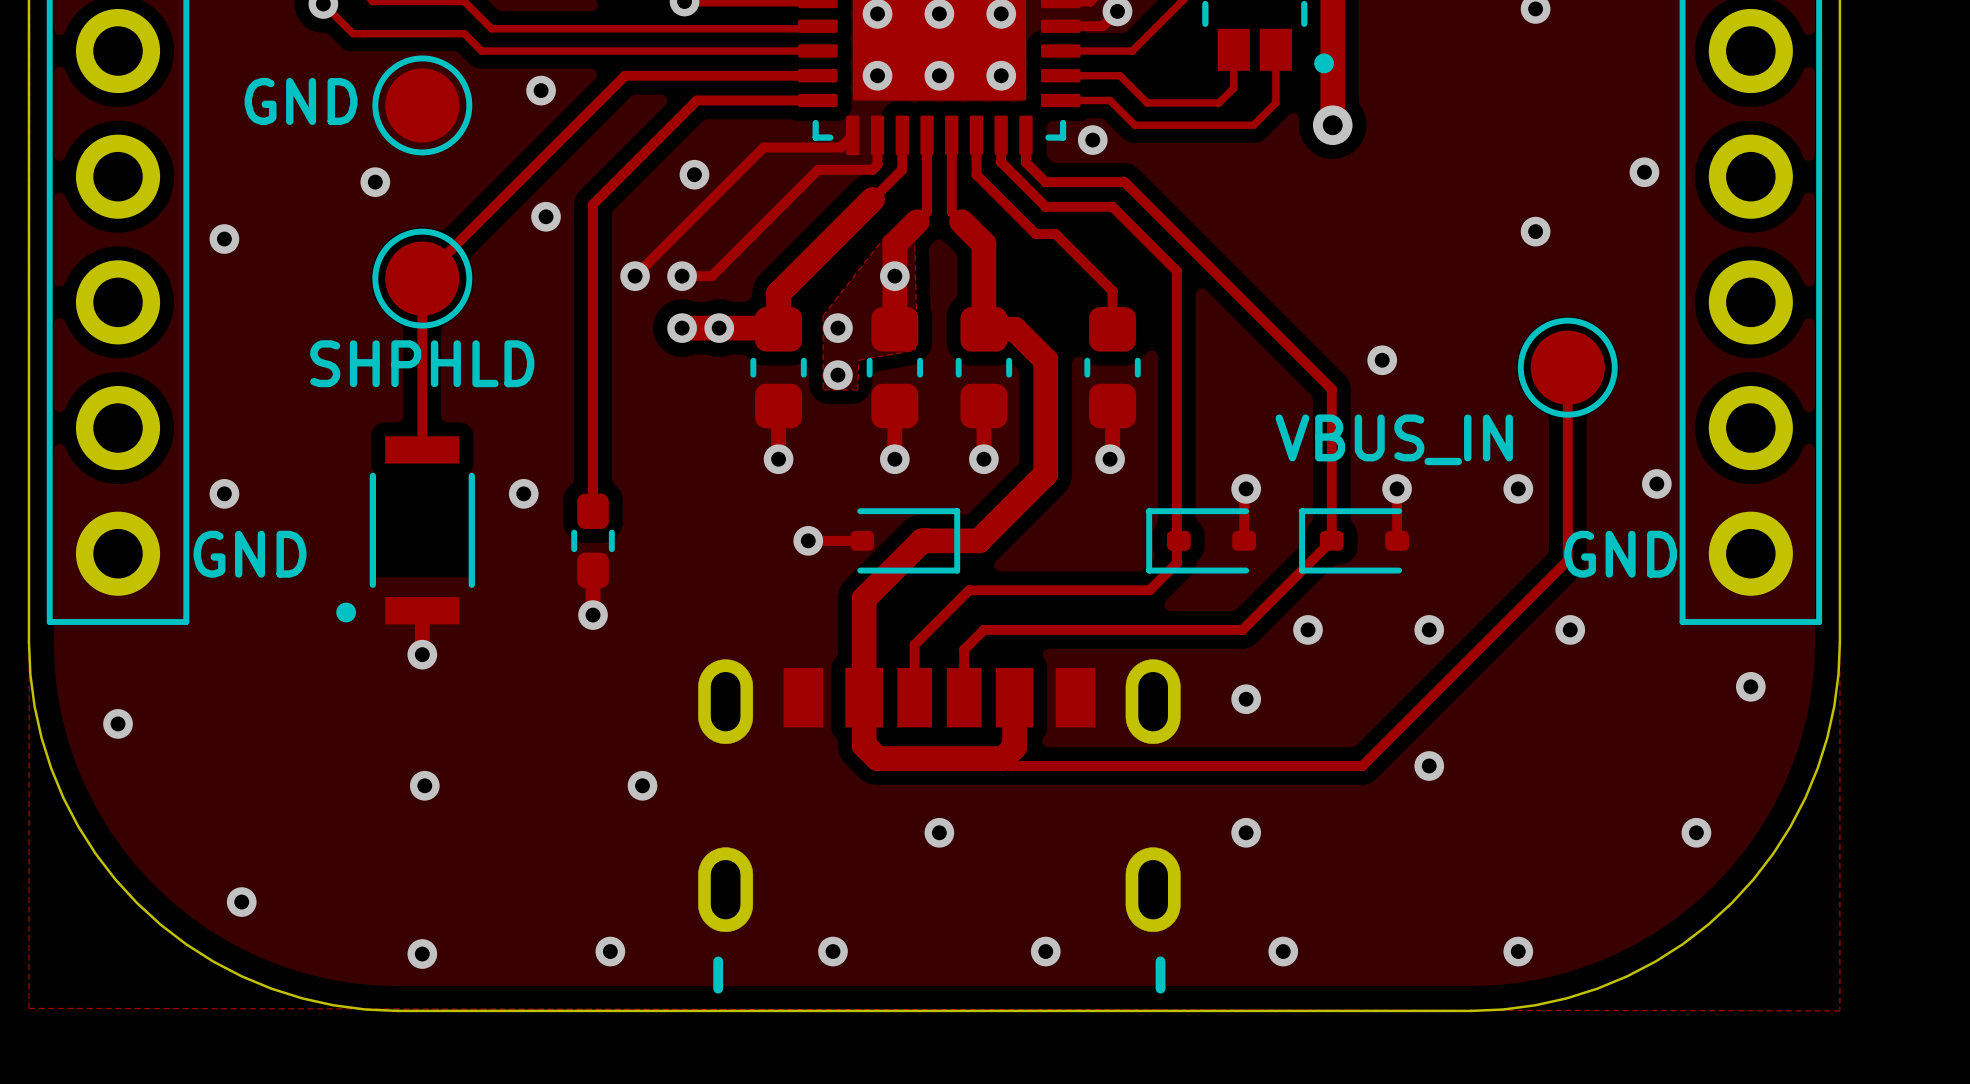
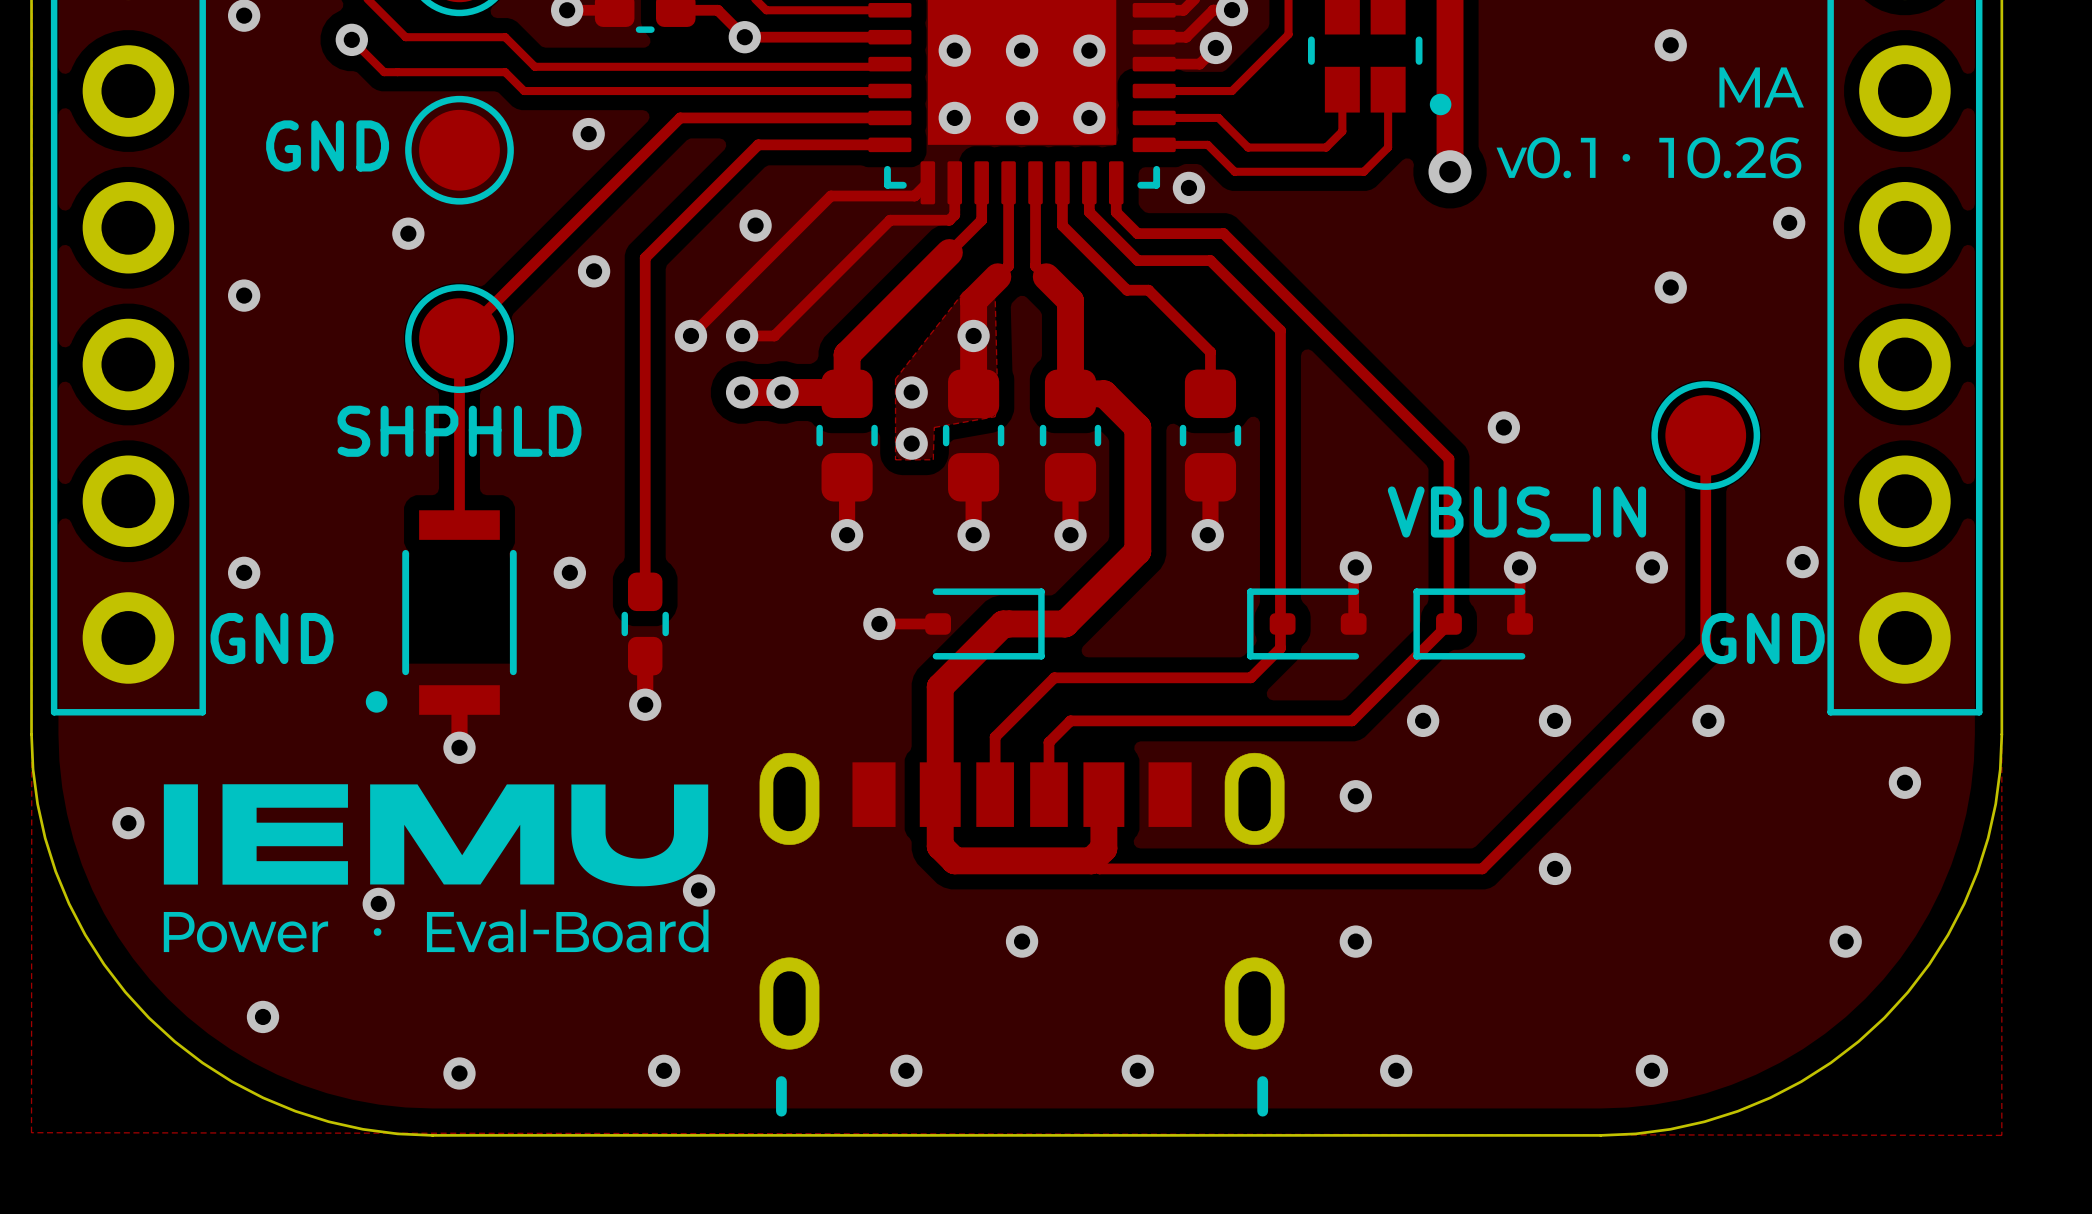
drawing: none -> [1496, 67, 1804, 179]
drawing: none -> [163, 784, 709, 953]
via position: (424, 785) -> (378, 903)

